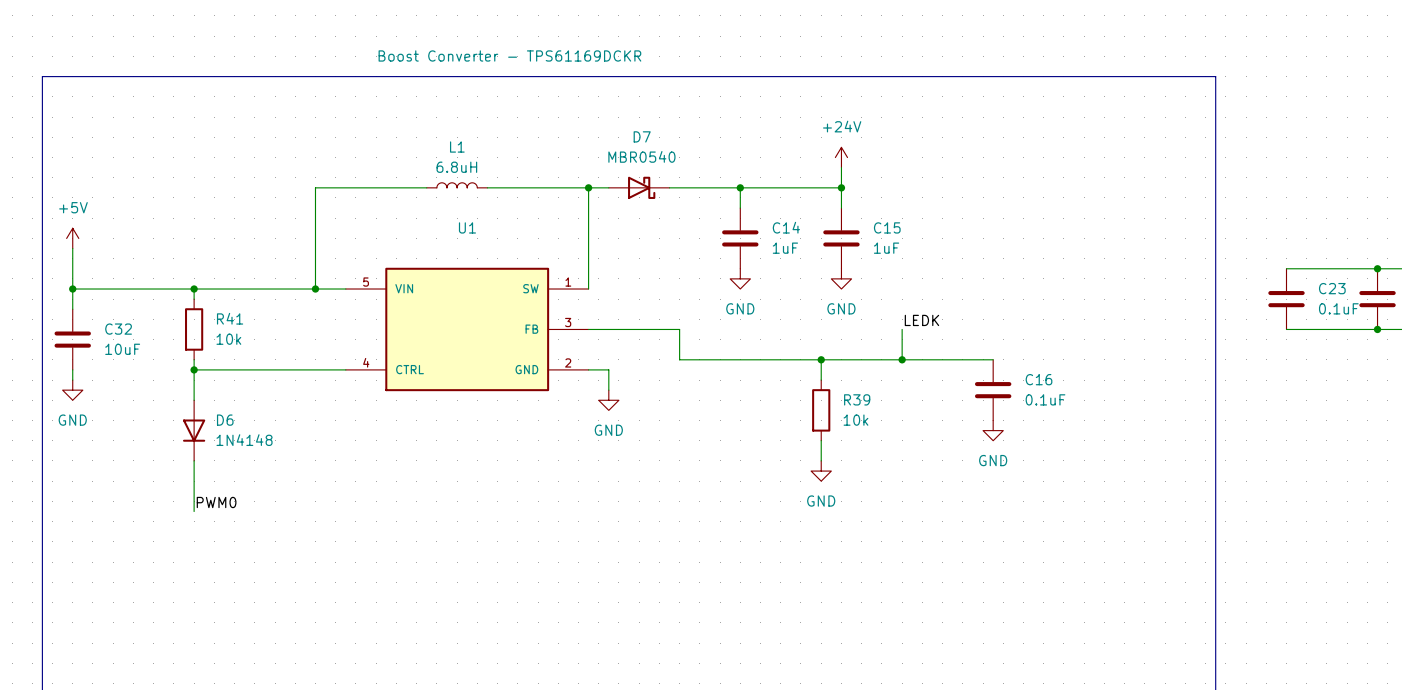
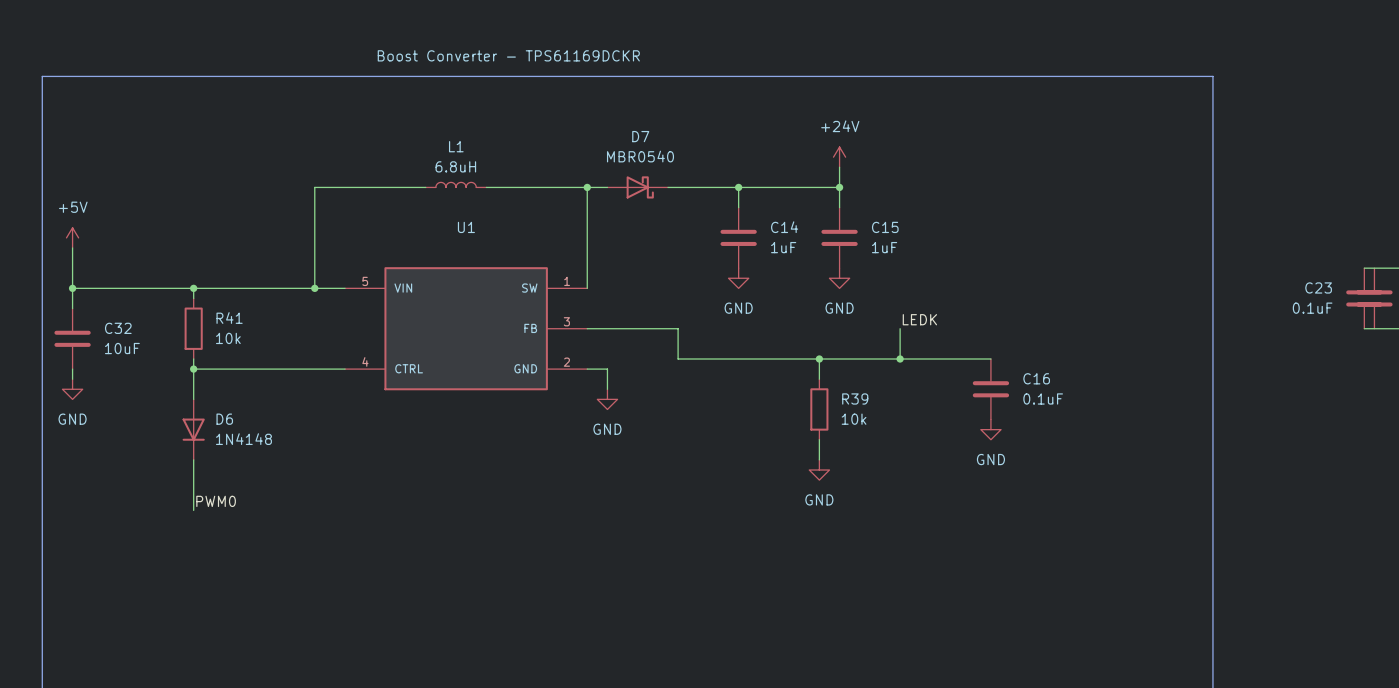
wire: (1286, 268) (1367, 268) -> none
junction: (1377, 268) -> none
C23 name position: C23 (1332, 288) -> C23 (1318, 287)
C23 position: (1286, 299) -> (1364, 298)
C23 value position: 0.1uF (1338, 308) -> 0.1uF (1312, 308)
wire: (1286, 329) (1367, 329) -> none
junction: (1377, 329) -> none

